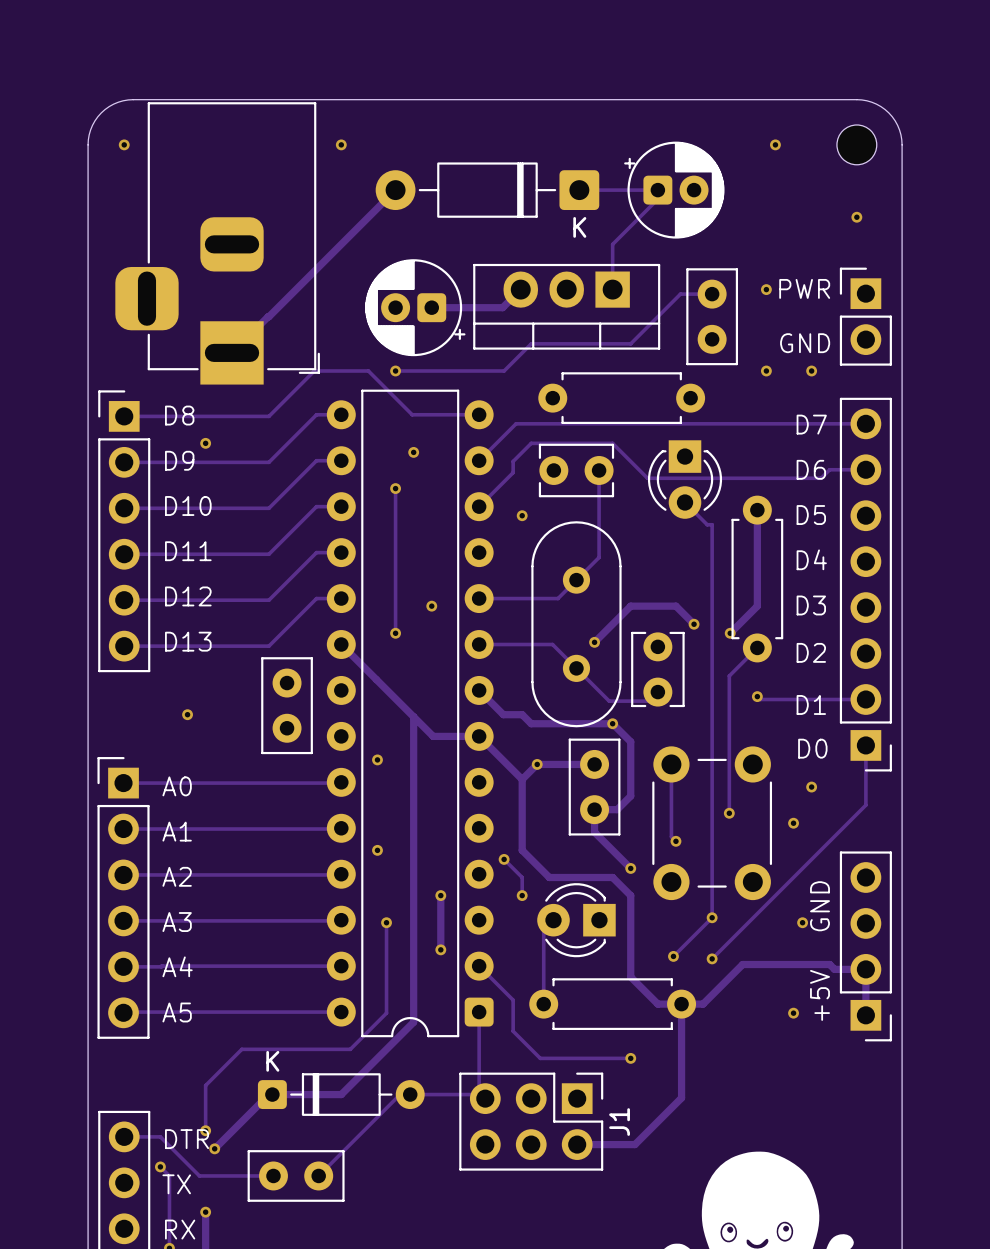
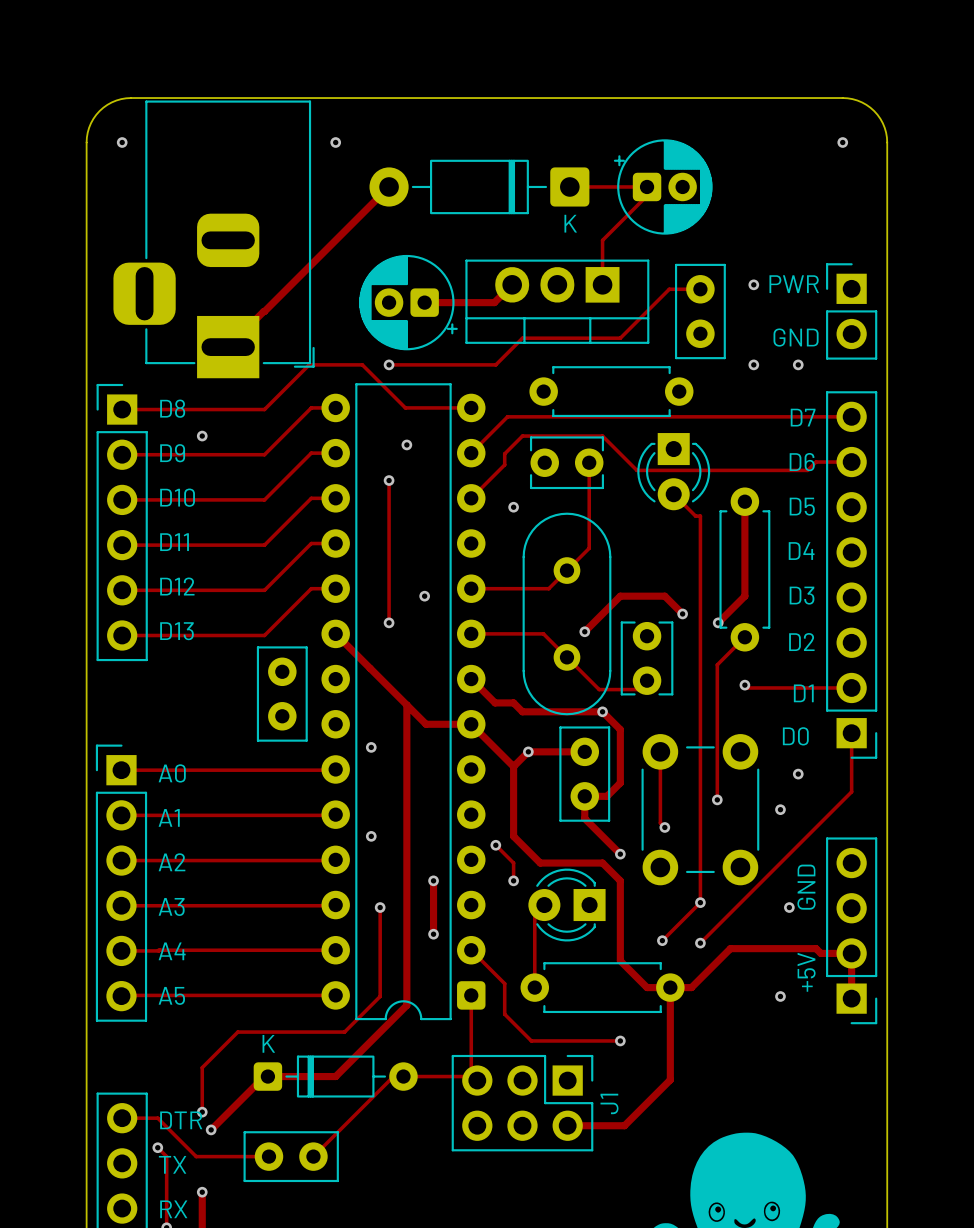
via: (775, 144) -> none
part: (856, 144) -> none
via: none -> (842, 142)
via: (856, 217) -> none
via: (187, 714) -> none

